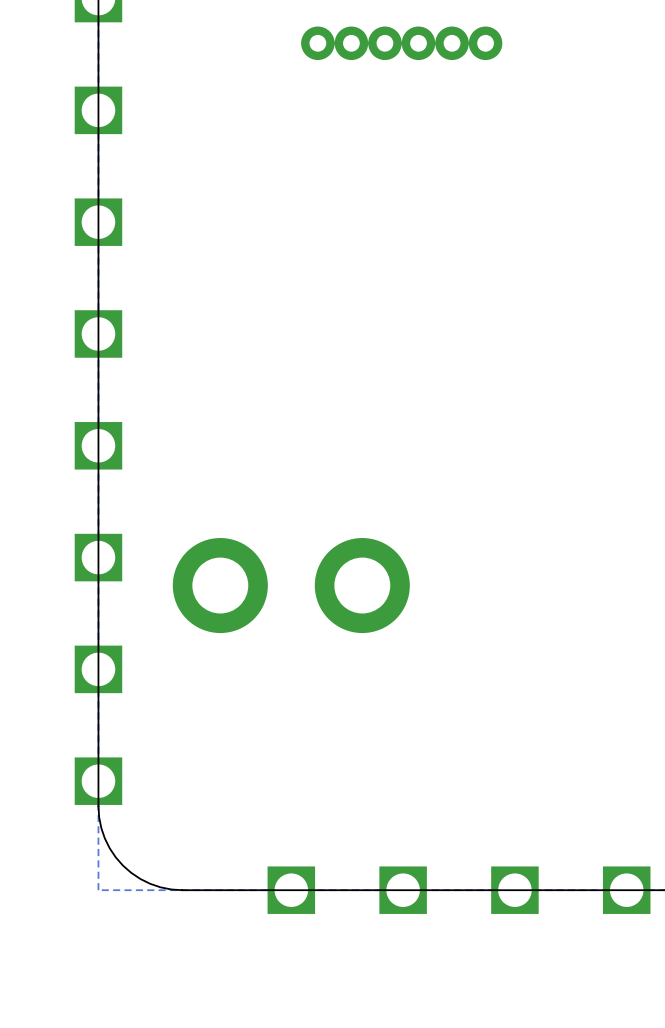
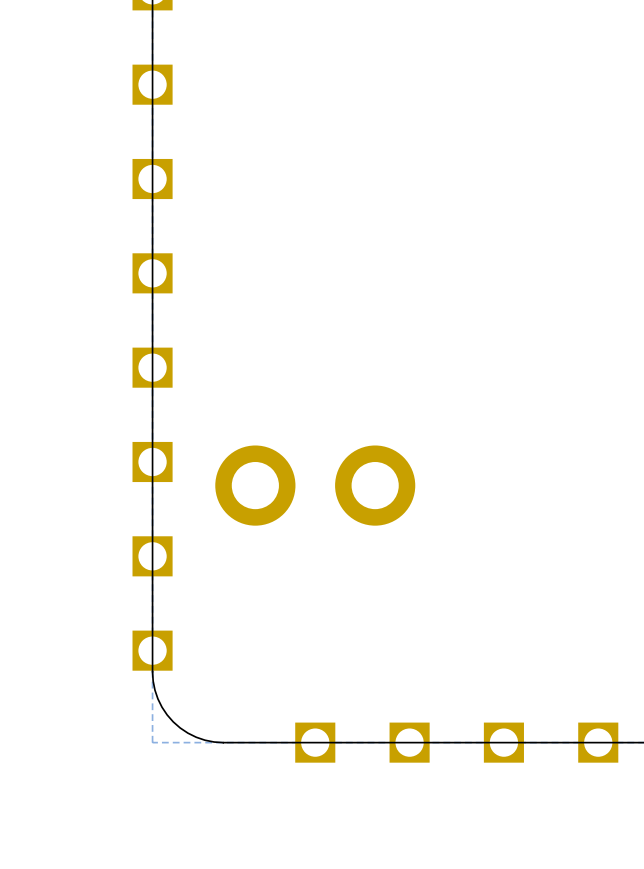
via: (317, 43) -> none
via: (351, 43) -> none
via: (384, 43) -> none
via: (418, 43) -> none
via: (452, 43) -> none
via: (485, 43) -> none

